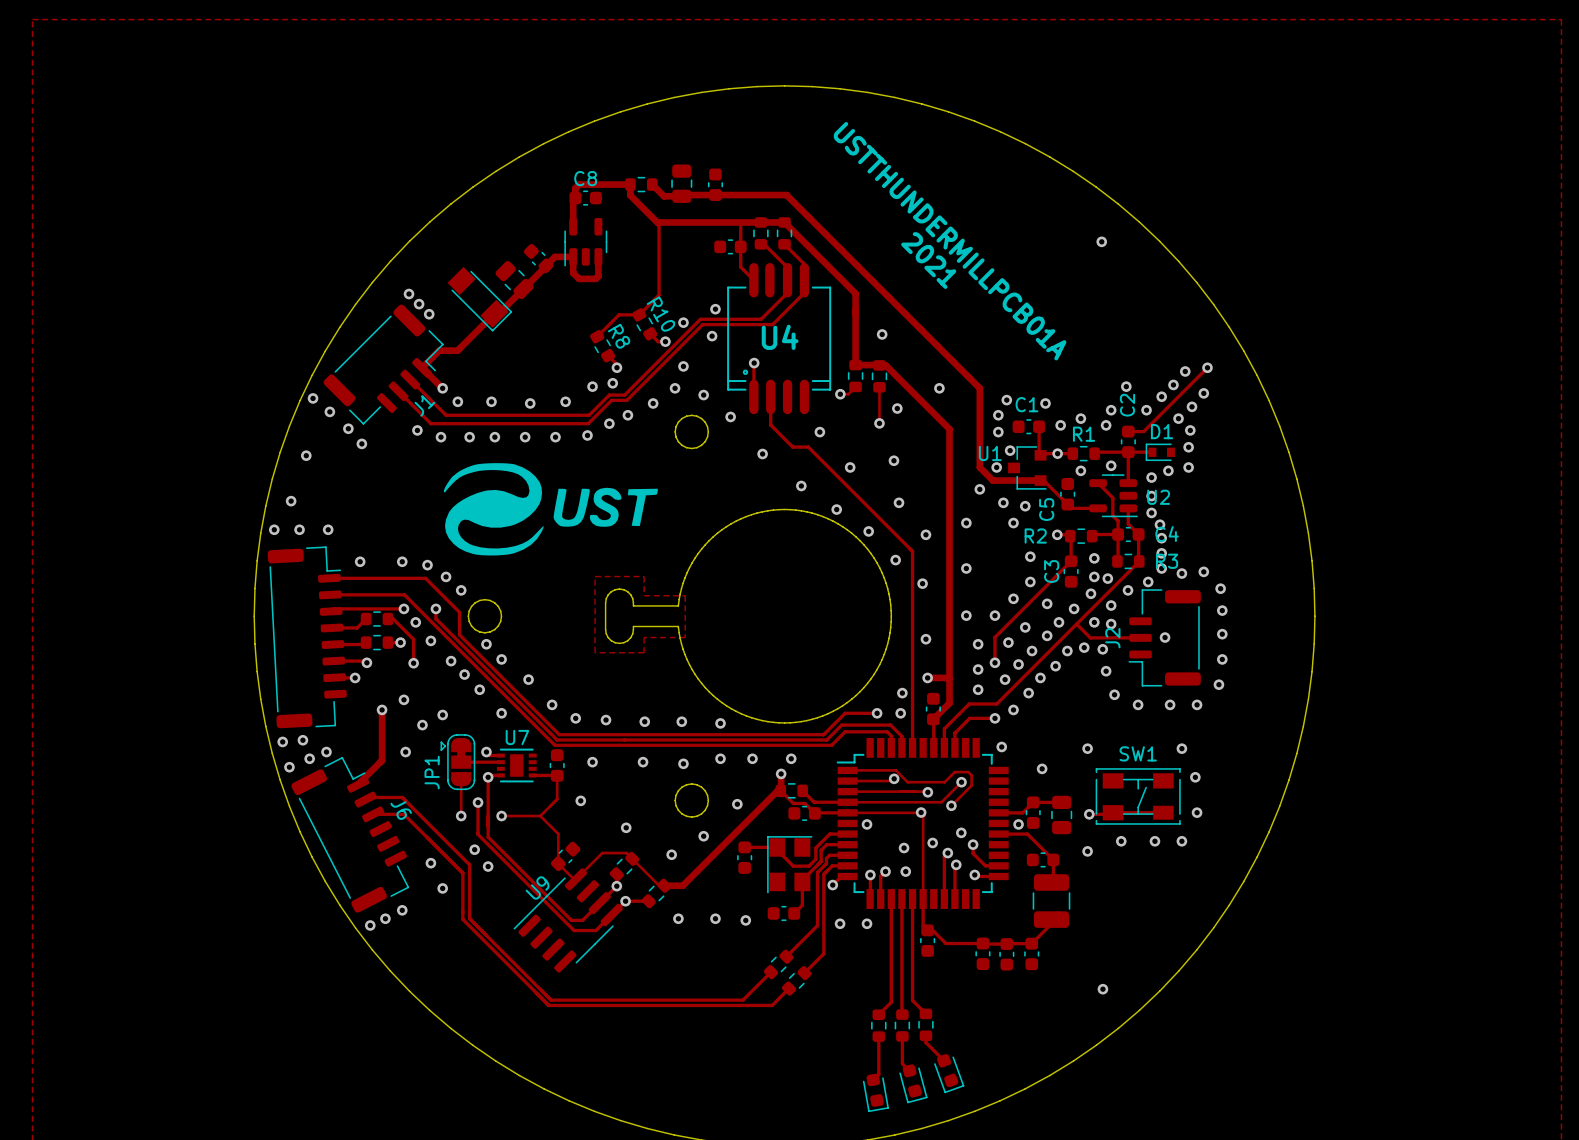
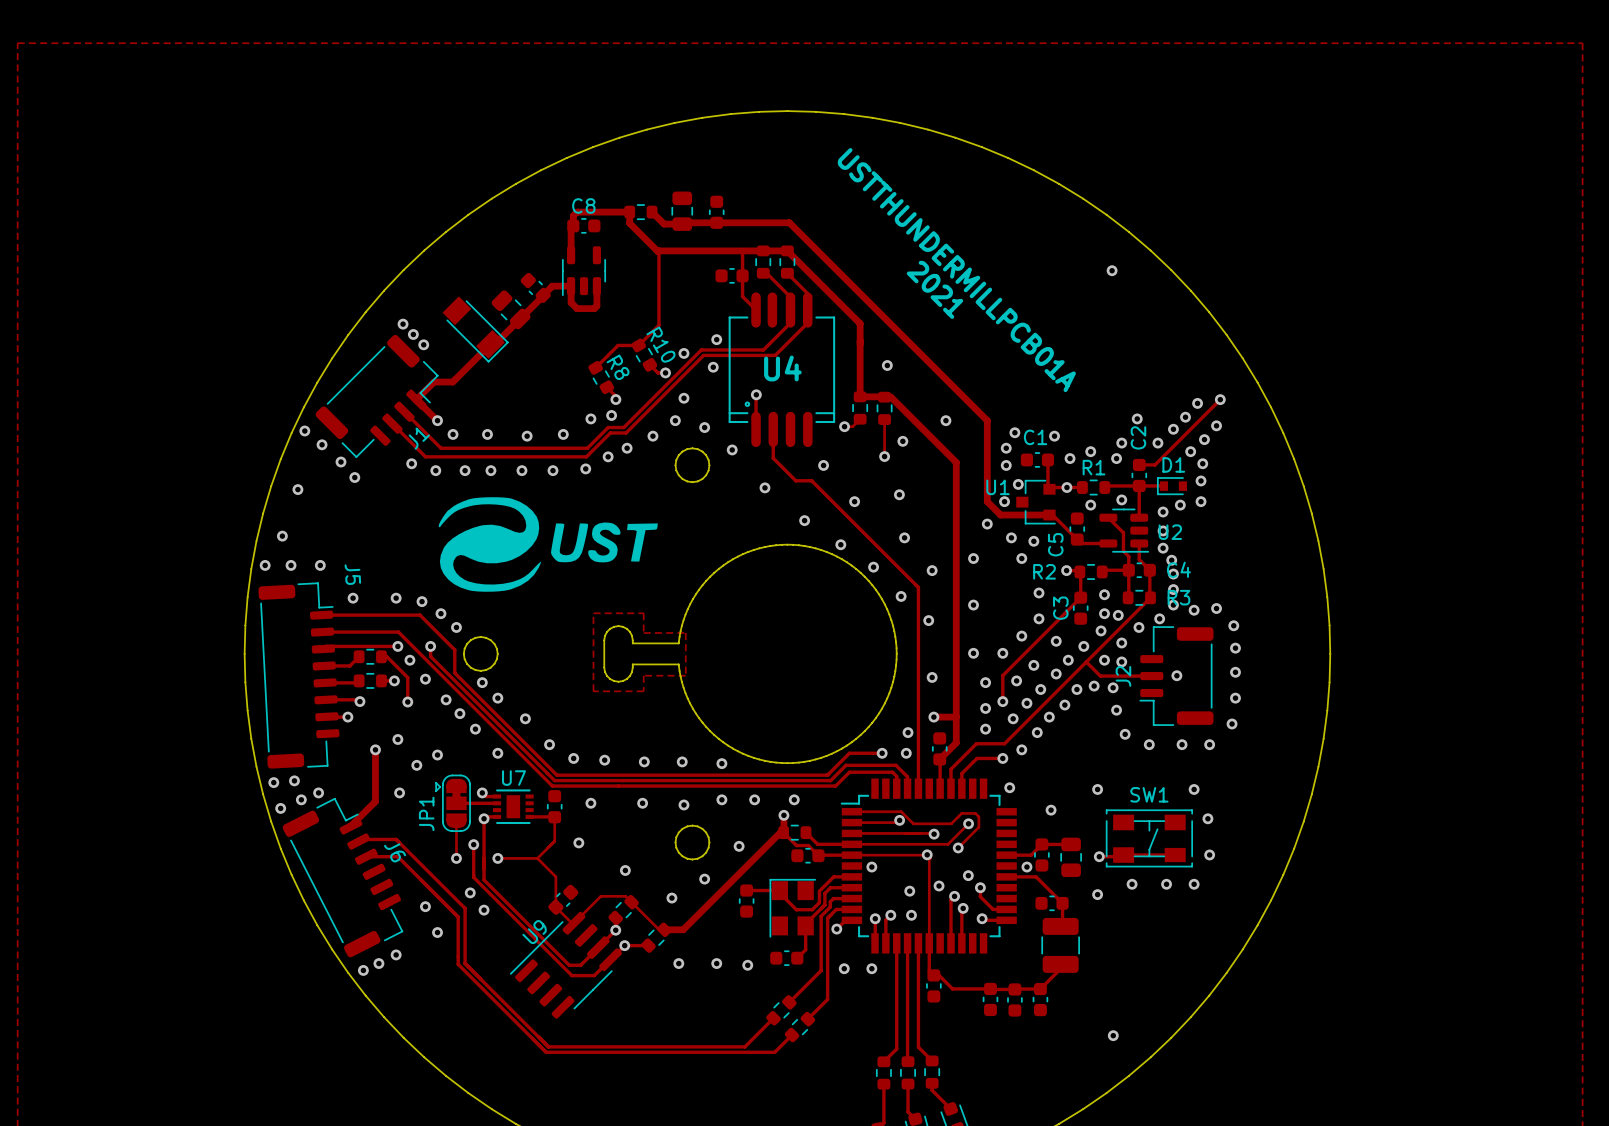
J5 name: none -> J5 (352, 574)

